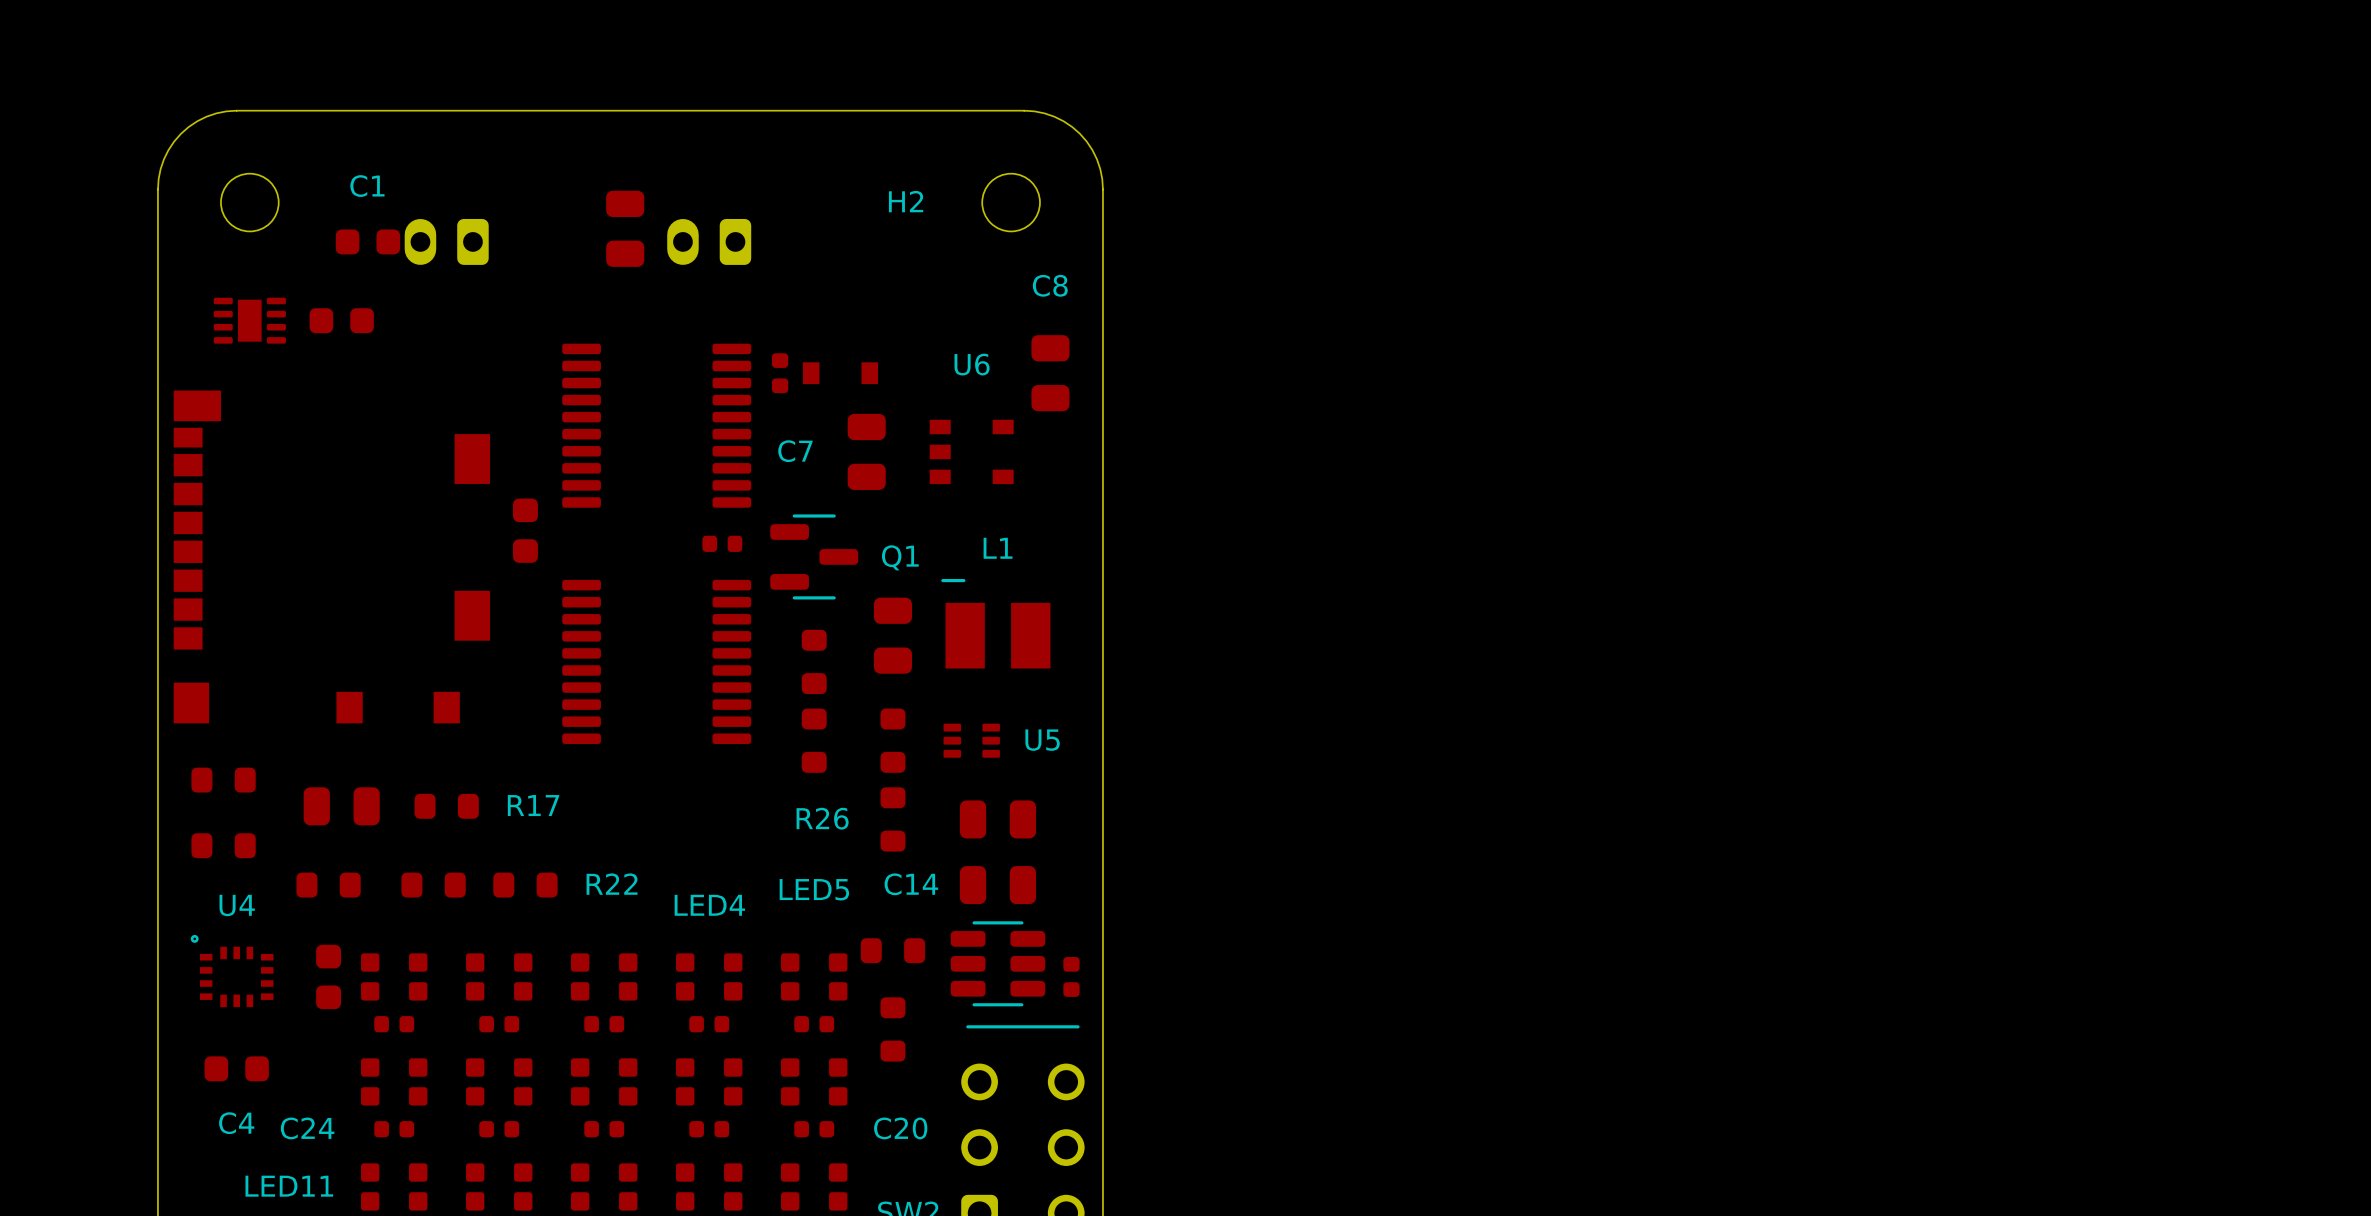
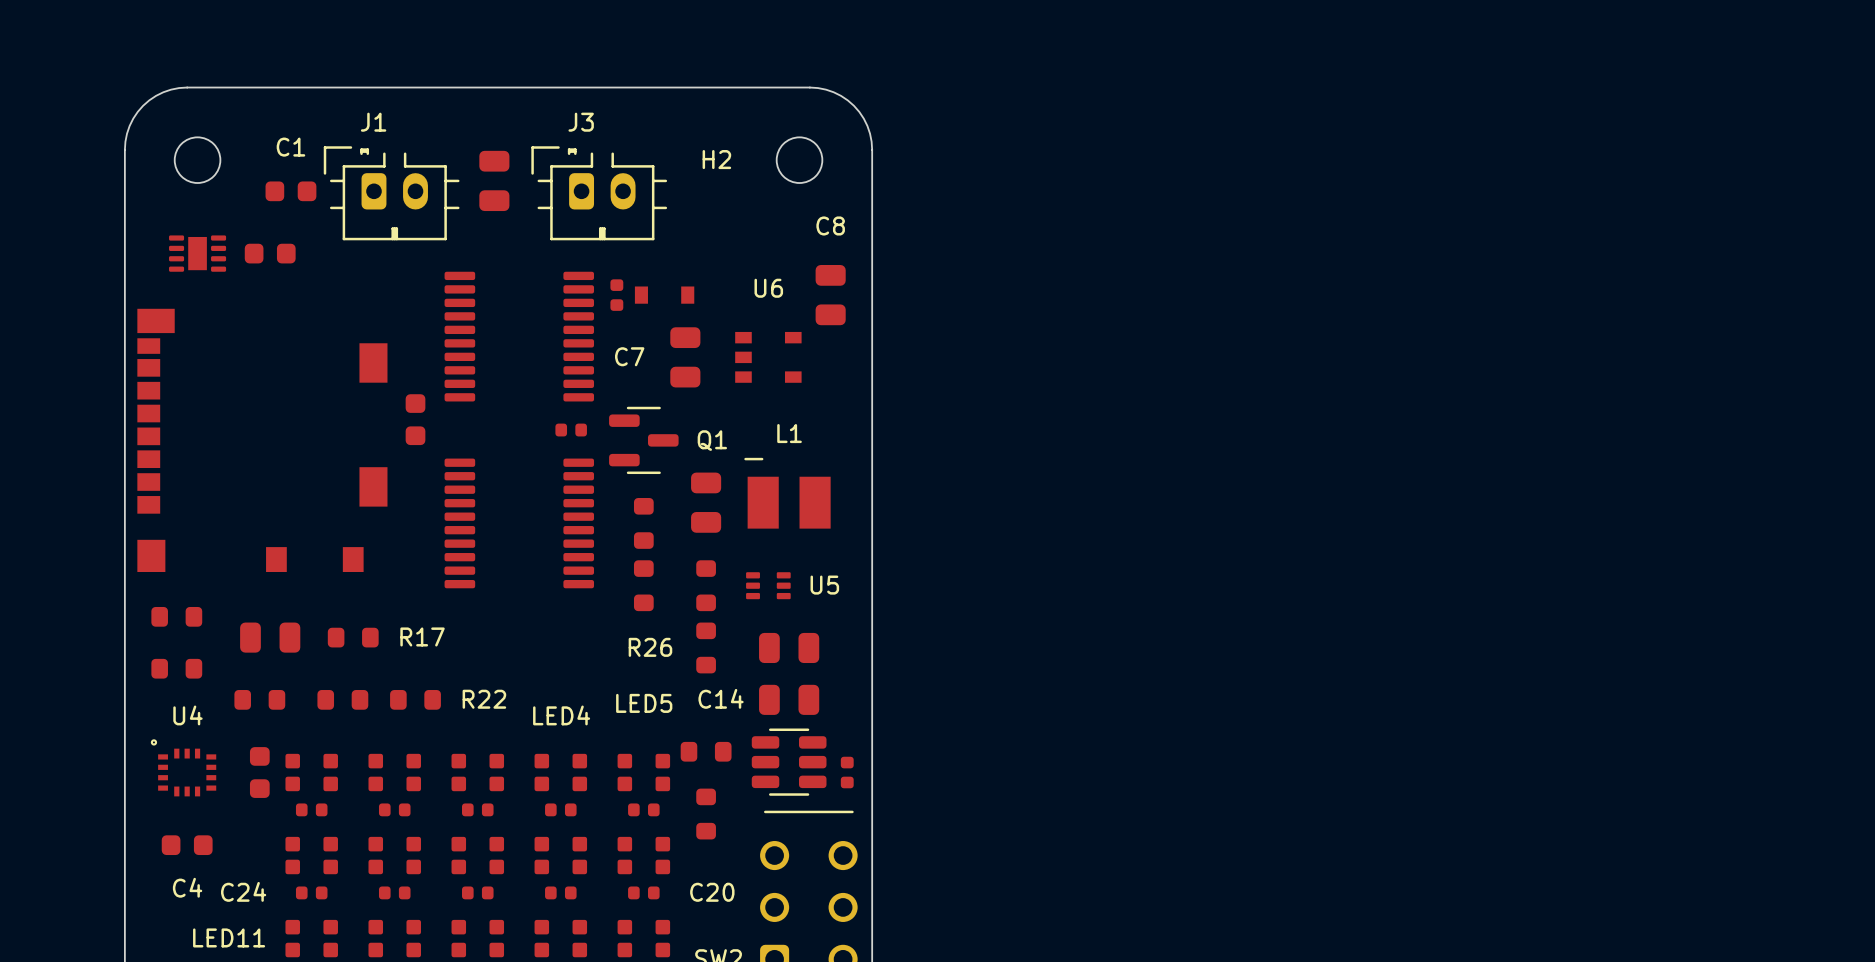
J1 side: bottom (446, 241) -> top (391, 193)
J3 side: bottom (709, 241) -> top (599, 193)

